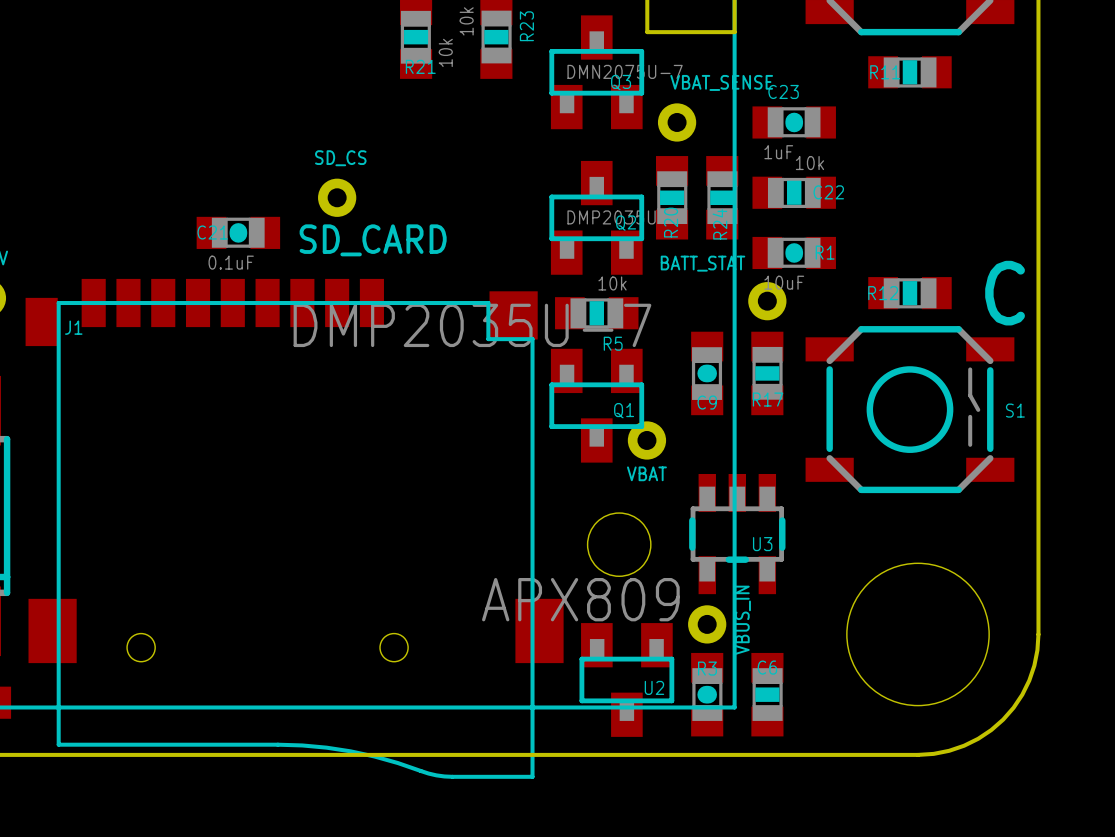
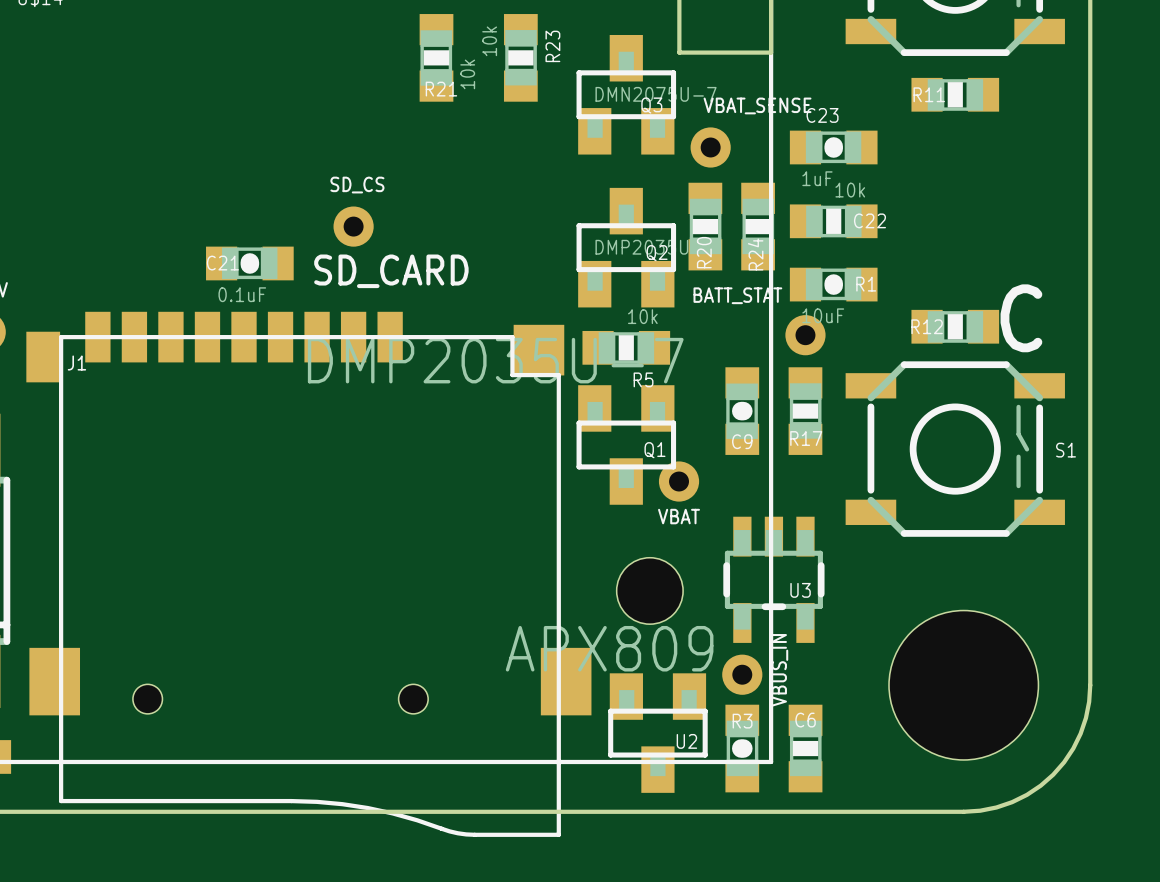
text position: C (1005, 293) -> C (1021, 318)

